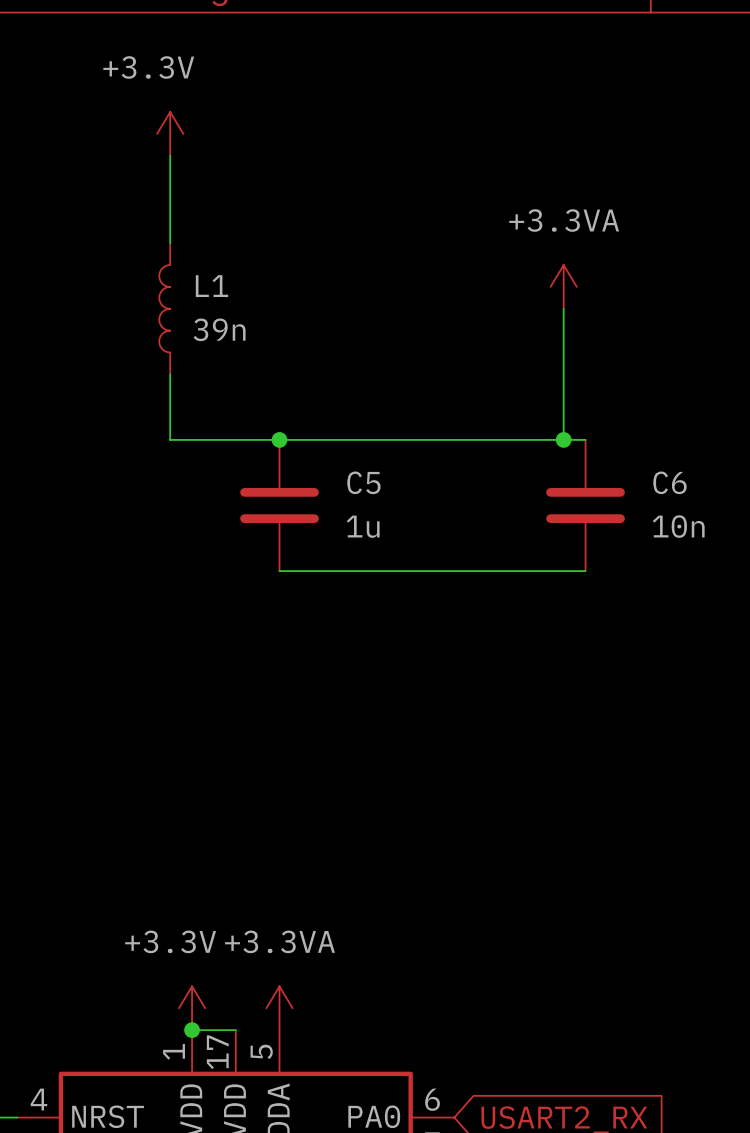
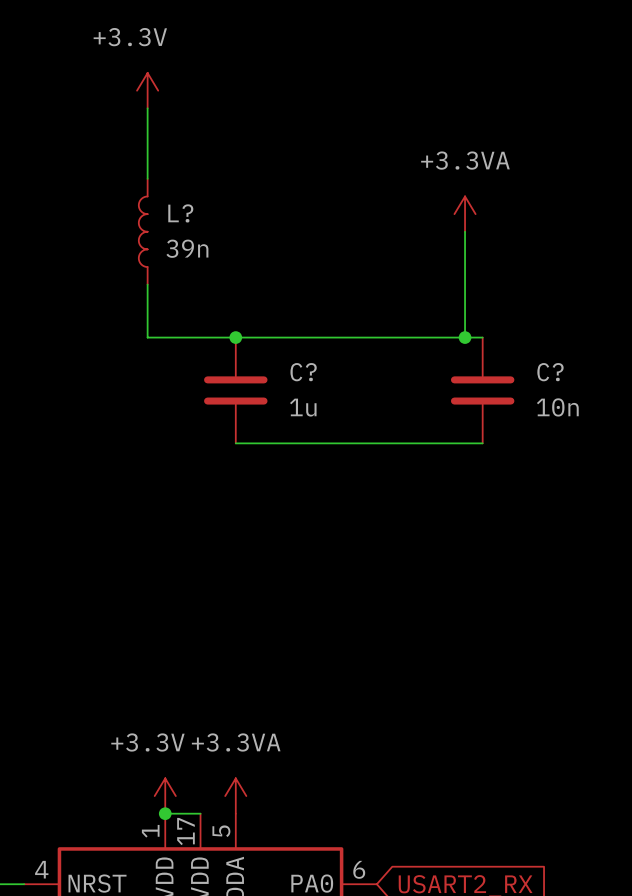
L1 name: L1 (212, 286) -> L? (180, 213)
C5 name: C5 (363, 482) -> C? (303, 372)
C6 name: C6 (670, 482) -> C? (550, 372)

